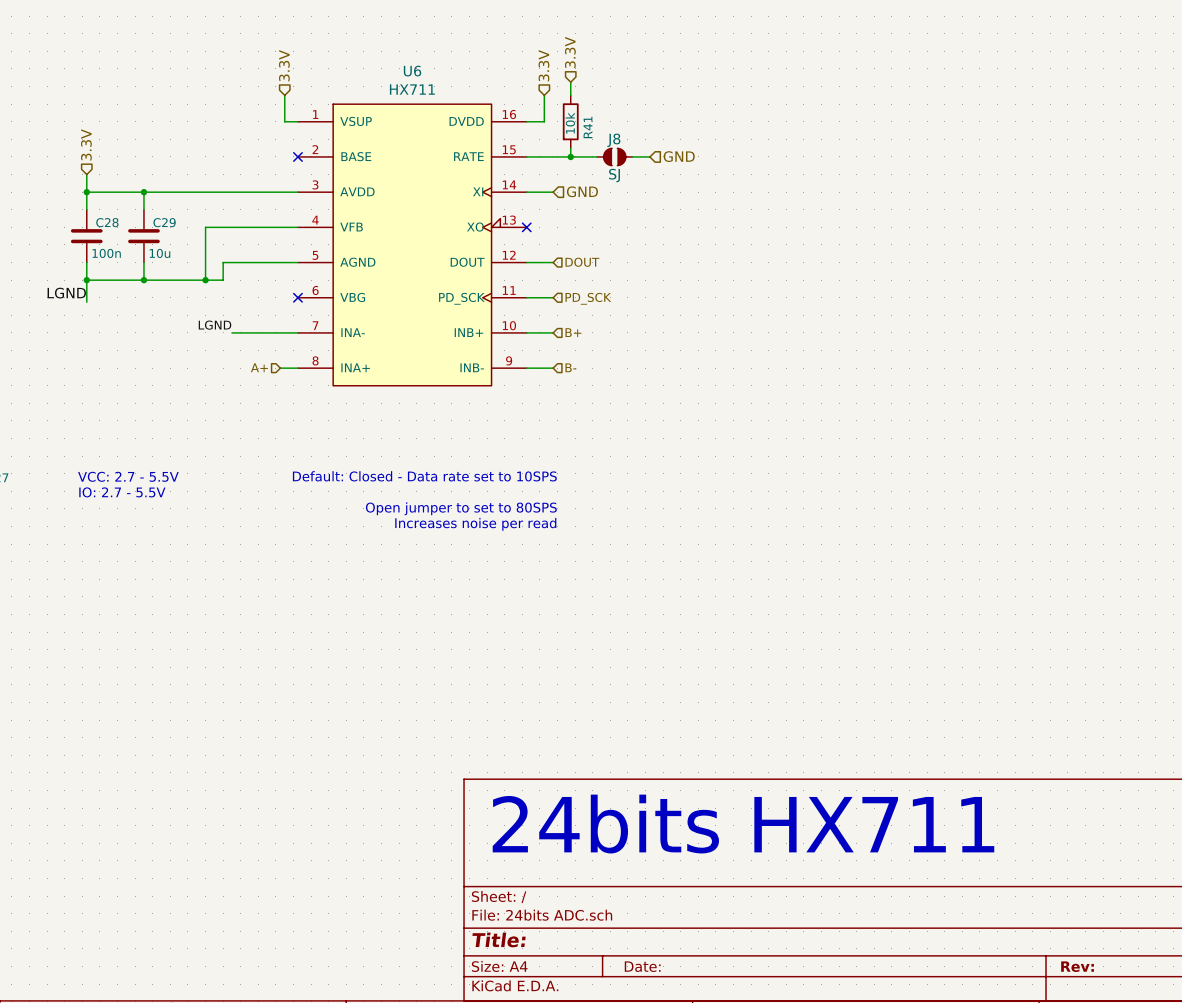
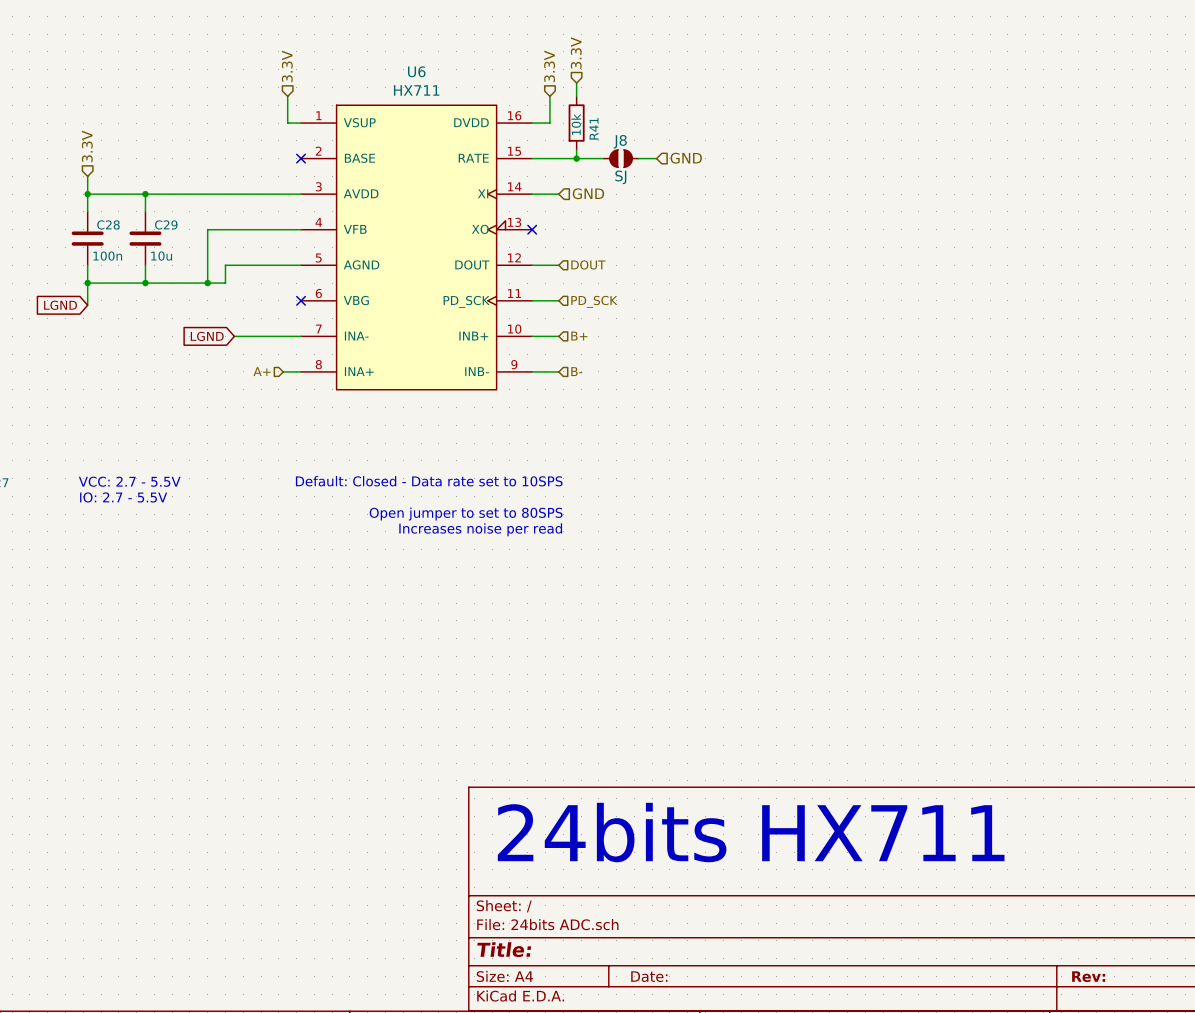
label: LGND (66, 293) -> none
global label: none -> LGND (60, 305)
label: LGND (215, 325) -> none
global label: none -> LGND (207, 336)

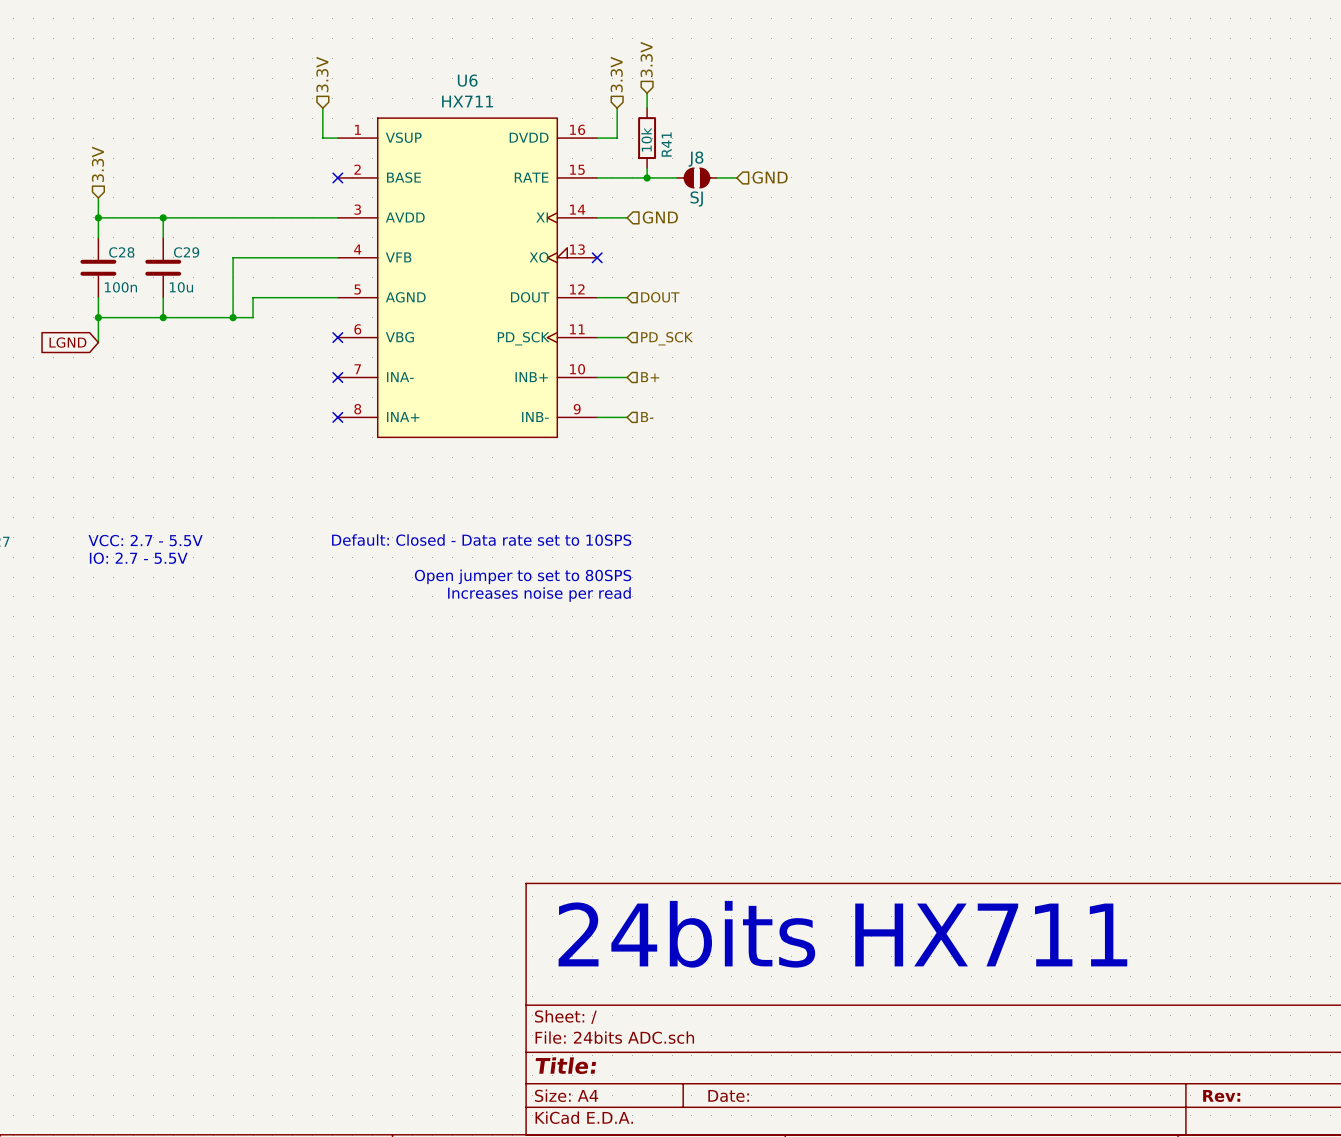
global label: LGND (207, 336) -> none
wire: (234, 336) (301, 336) -> none
no-connect mark: none -> (337, 377)
hierarchical label: A+ (262, 371) -> none
wire: (283, 371) (301, 371) -> none
no-connect mark: none -> (337, 417)

